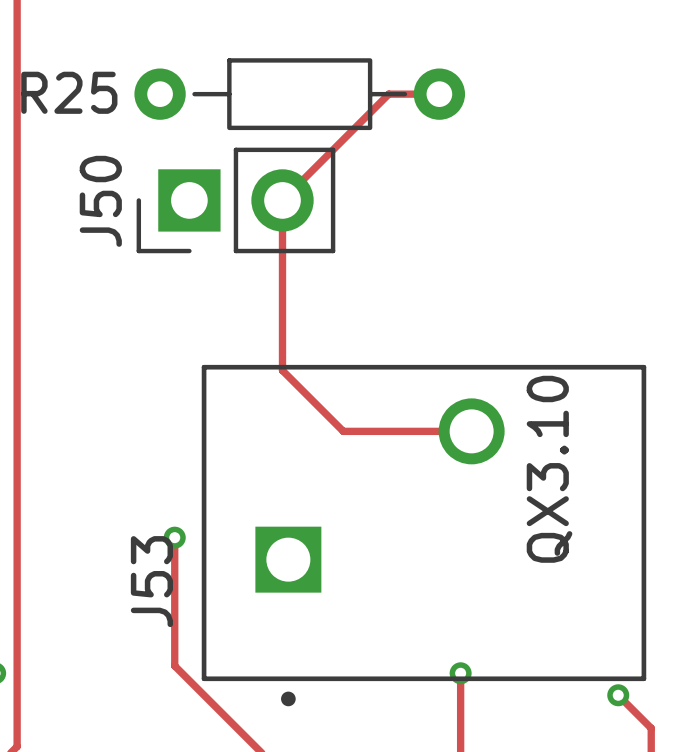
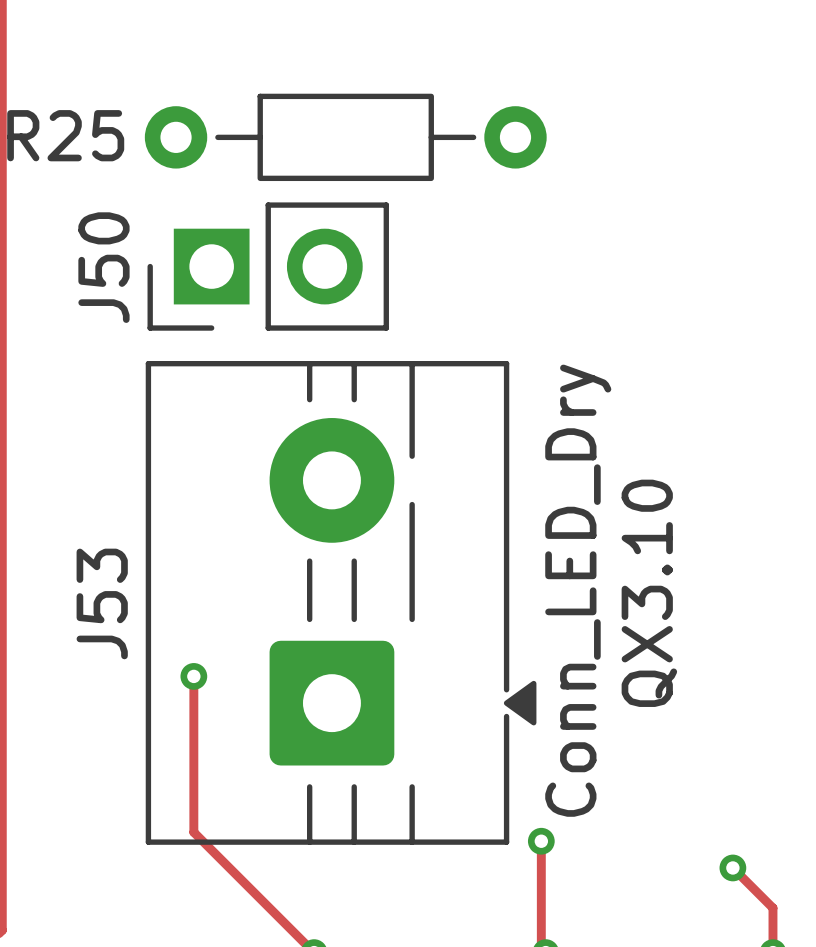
track: (439, 94) (388, 94) (282, 200) (282, 370) (343, 431) (471, 431) -> none
J53 footprint: [201, 364, 647, 707] -> [145, 361, 537, 845]
J53 value: none -> Conn_LED_Dry (578, 590)
J53 name position: J53 (151, 581) -> J53 (102, 603)

